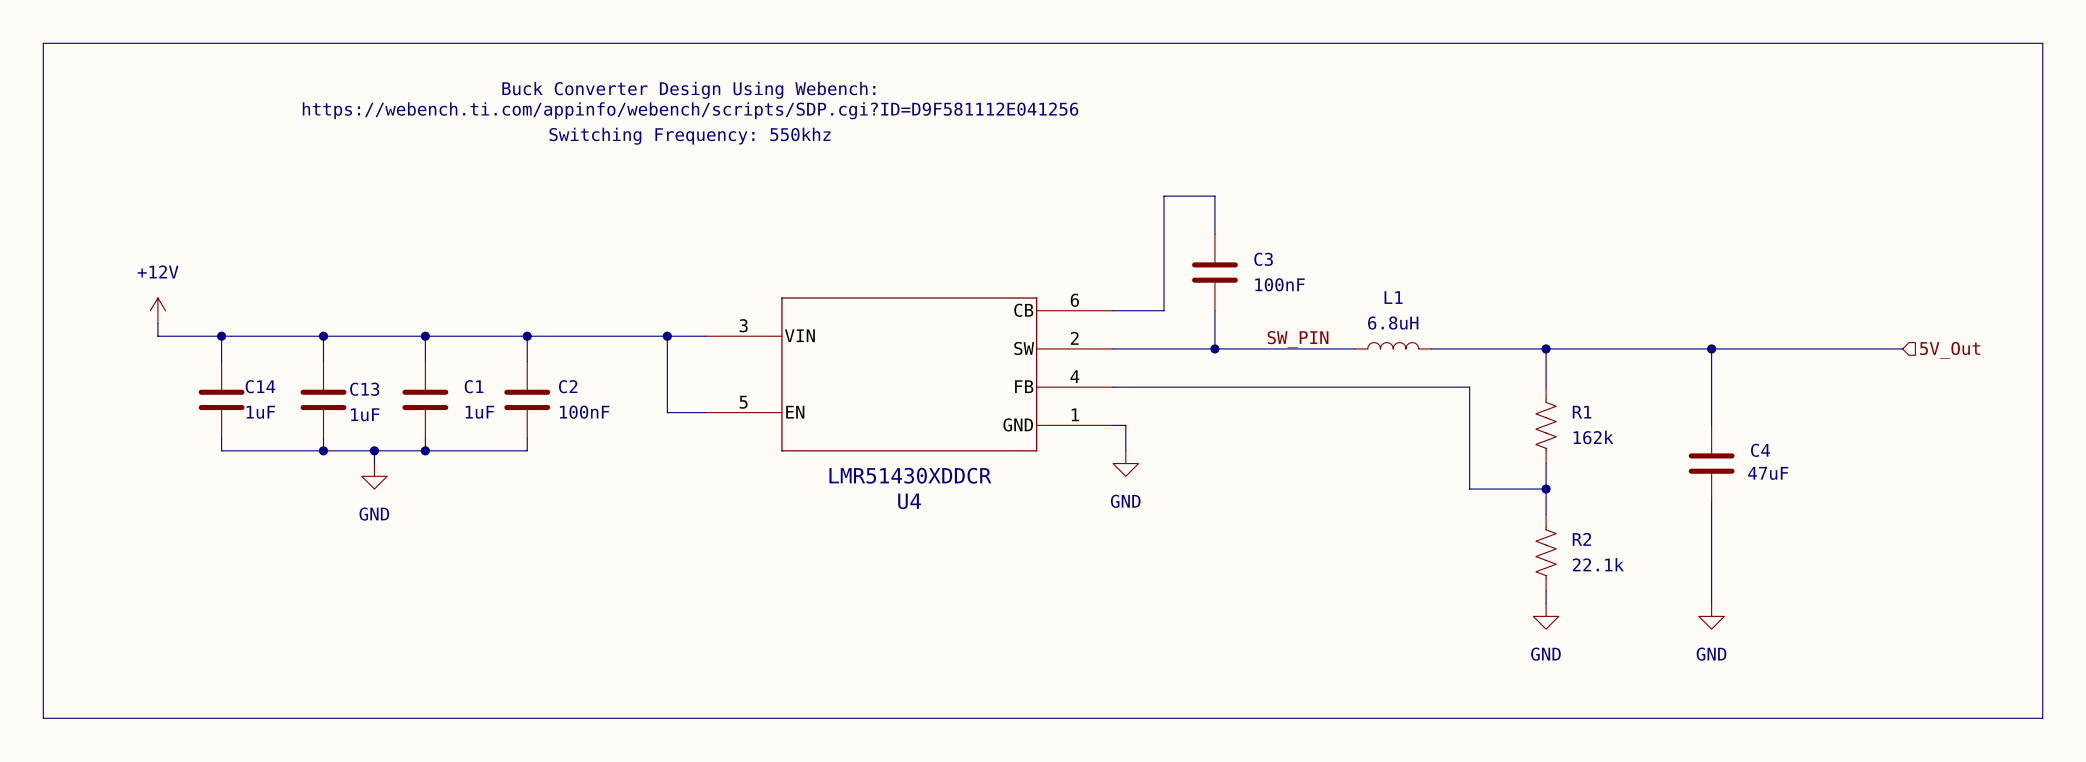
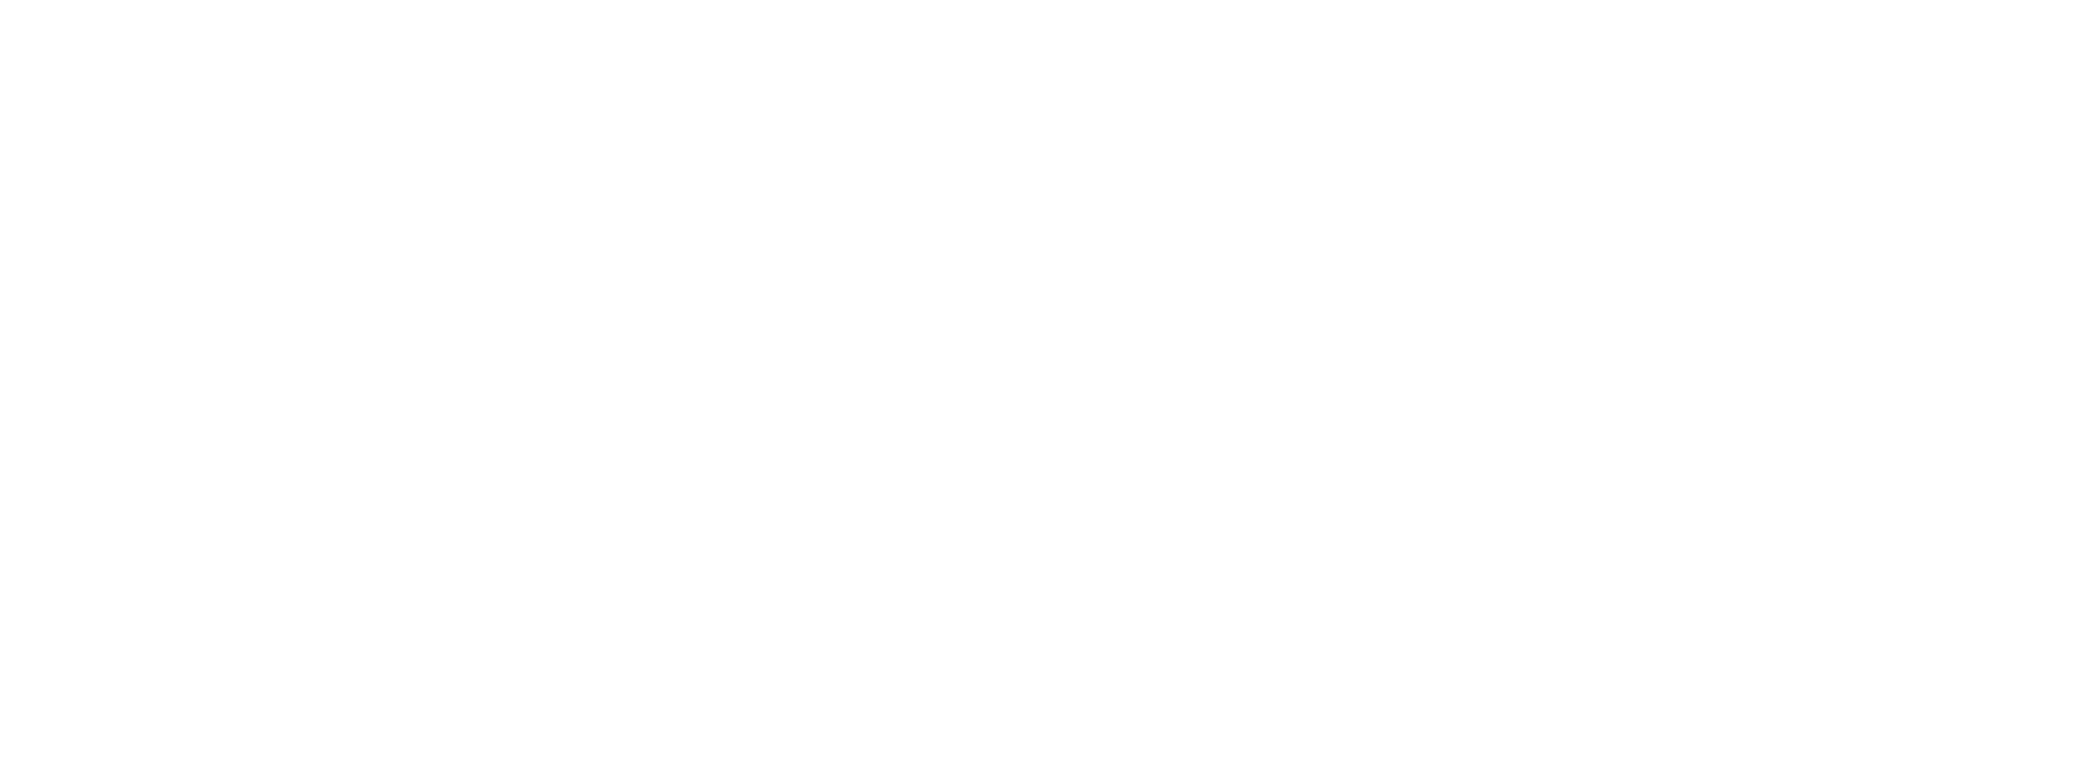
line: (43, 43) (2042, 43) (2042, 718) (43, 718) (43, 43) -> none
text: Buck Converter Design Using Webench: (688, 90) -> none
text: https://webench.ti.com/appinfo/webench/scripts/SDP.cgi?ID=D9F581112E041256 (690, 110) -> none
text: Switching Frequency: 550khz (690, 136) -> none
wire: (1214, 234) (1214, 196) (1164, 196) (1164, 310) (1113, 310) -> none
C3: 100nF (1214, 272) -> none
power symbol: +12V (157, 310) -> none
wire: (1214, 310) (1214, 348) -> none
wire: (157, 323) (157, 336) (705, 336) -> none
wire: (221, 336) (221, 361) -> none
junction: (221, 336) -> none
wire: (323, 336) (323, 361) -> none
junction: (323, 336) -> none
wire: (425, 336) (425, 361) -> none
junction: (425, 336) -> none
wire: (527, 336) (527, 361) -> none
junction: (527, 336) -> none
wire: (667, 336) (667, 412) (705, 412) -> none
junction: (667, 336) -> none
label: SW_PIN (1298, 339) -> none
L1: 6.8uH (1393, 345) -> none
wire: (1113, 348) (1355, 348) -> none
junction: (1214, 348) -> none
wire: (1431, 348) (1902, 348) -> none
wire: (1546, 348) (1546, 387) -> none
junction: (1546, 348) -> none
wire: (1711, 348) (1711, 425) -> none
junction: (1711, 348) -> none
hierarchical label: 5V_Out (1950, 350) -> none
U4: LMR51430XDDCR (909, 374) -> none
wire: (1113, 387) (1469, 387) (1469, 489) (1546, 489) -> none
C14: 1uF (221, 399) -> none
C13: 1uF (323, 399) -> none
C1: 1uF (425, 399) -> none
C2: 100nF (527, 399) -> none
wire: (1113, 425) (1125, 425) (1125, 450) -> none
R1: 162k (1546, 425) -> none
wire: (221, 438) (221, 450) (527, 450) (527, 438) -> none
wire: (323, 438) (323, 450) -> none
wire: (425, 438) (425, 450) -> none
junction: (323, 450) -> none
wire: (374, 450) (374, 463) -> none
junction: (374, 450) -> none
junction: (425, 450) -> none
power symbol: GND (1125, 463) -> none
wire: (1546, 463) (1546, 514) -> none
C4: 47uF (1711, 463) -> none
power symbol: GND (374, 476) -> none
junction: (1546, 489) -> none
wire: (1711, 501) (1711, 603) -> none
R2: 22.1k (1546, 552) -> none
wire: (1546, 590) (1546, 603) -> none
power symbol: GND (1546, 616) -> none
power symbol: GND (1711, 616) -> none

